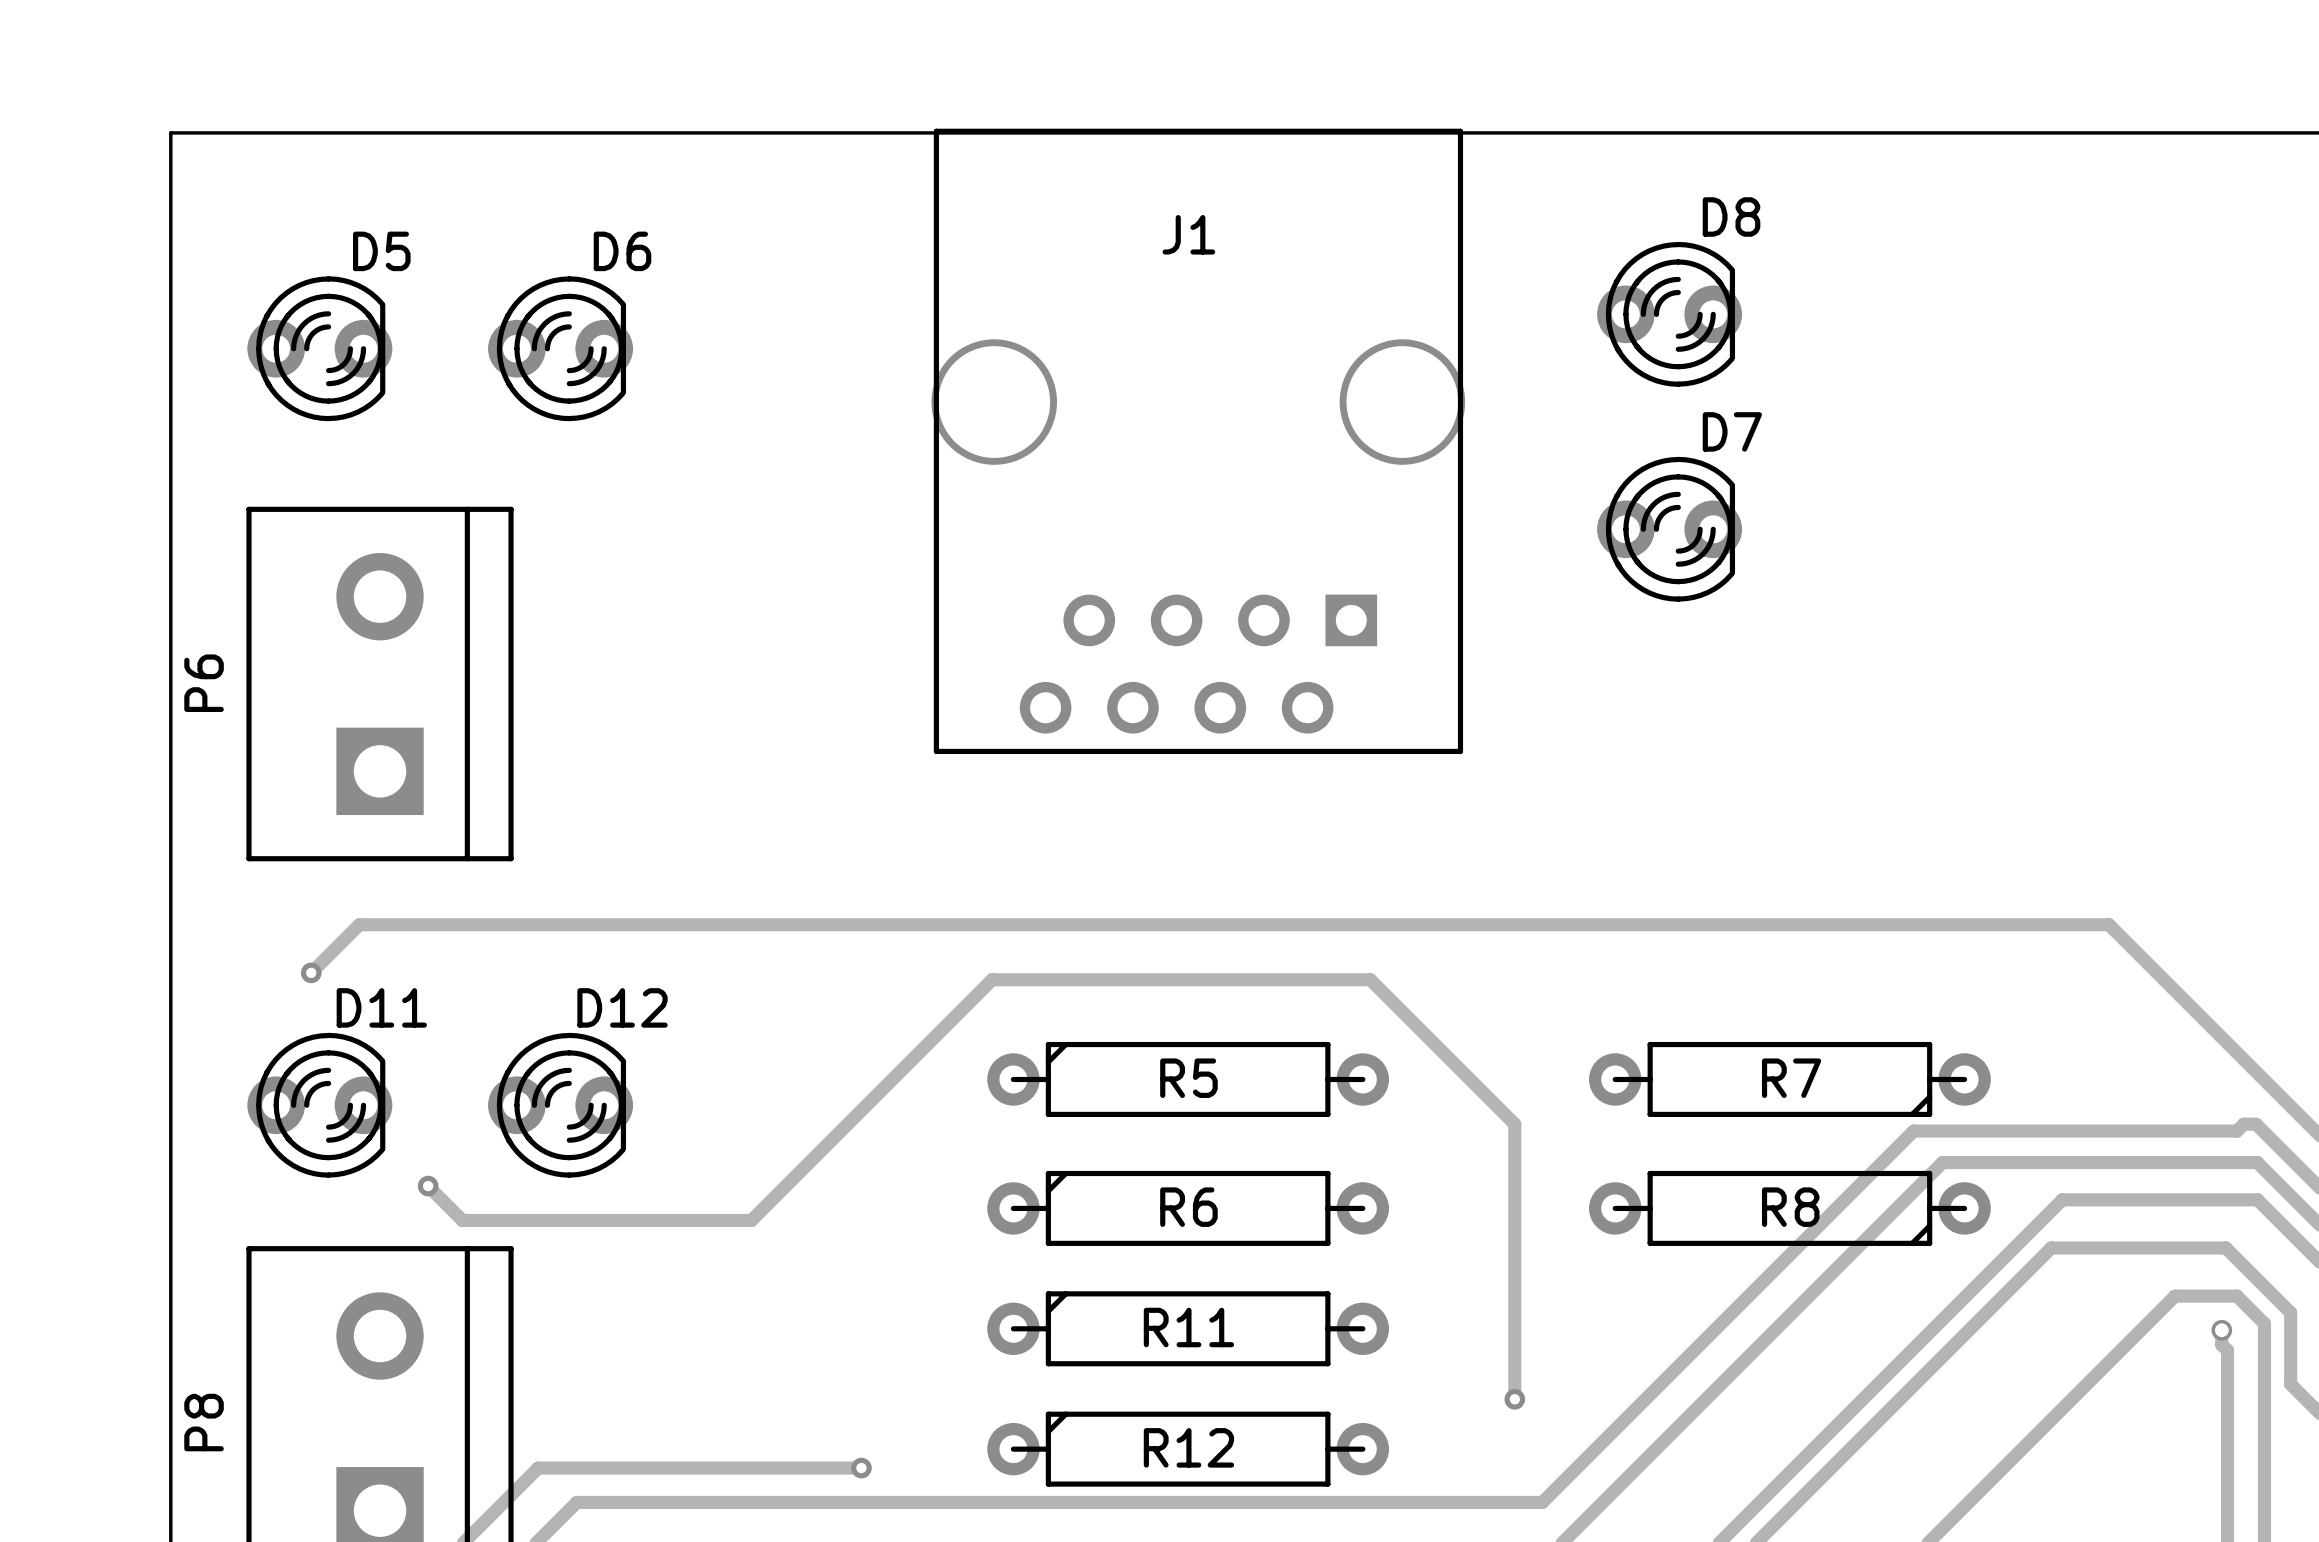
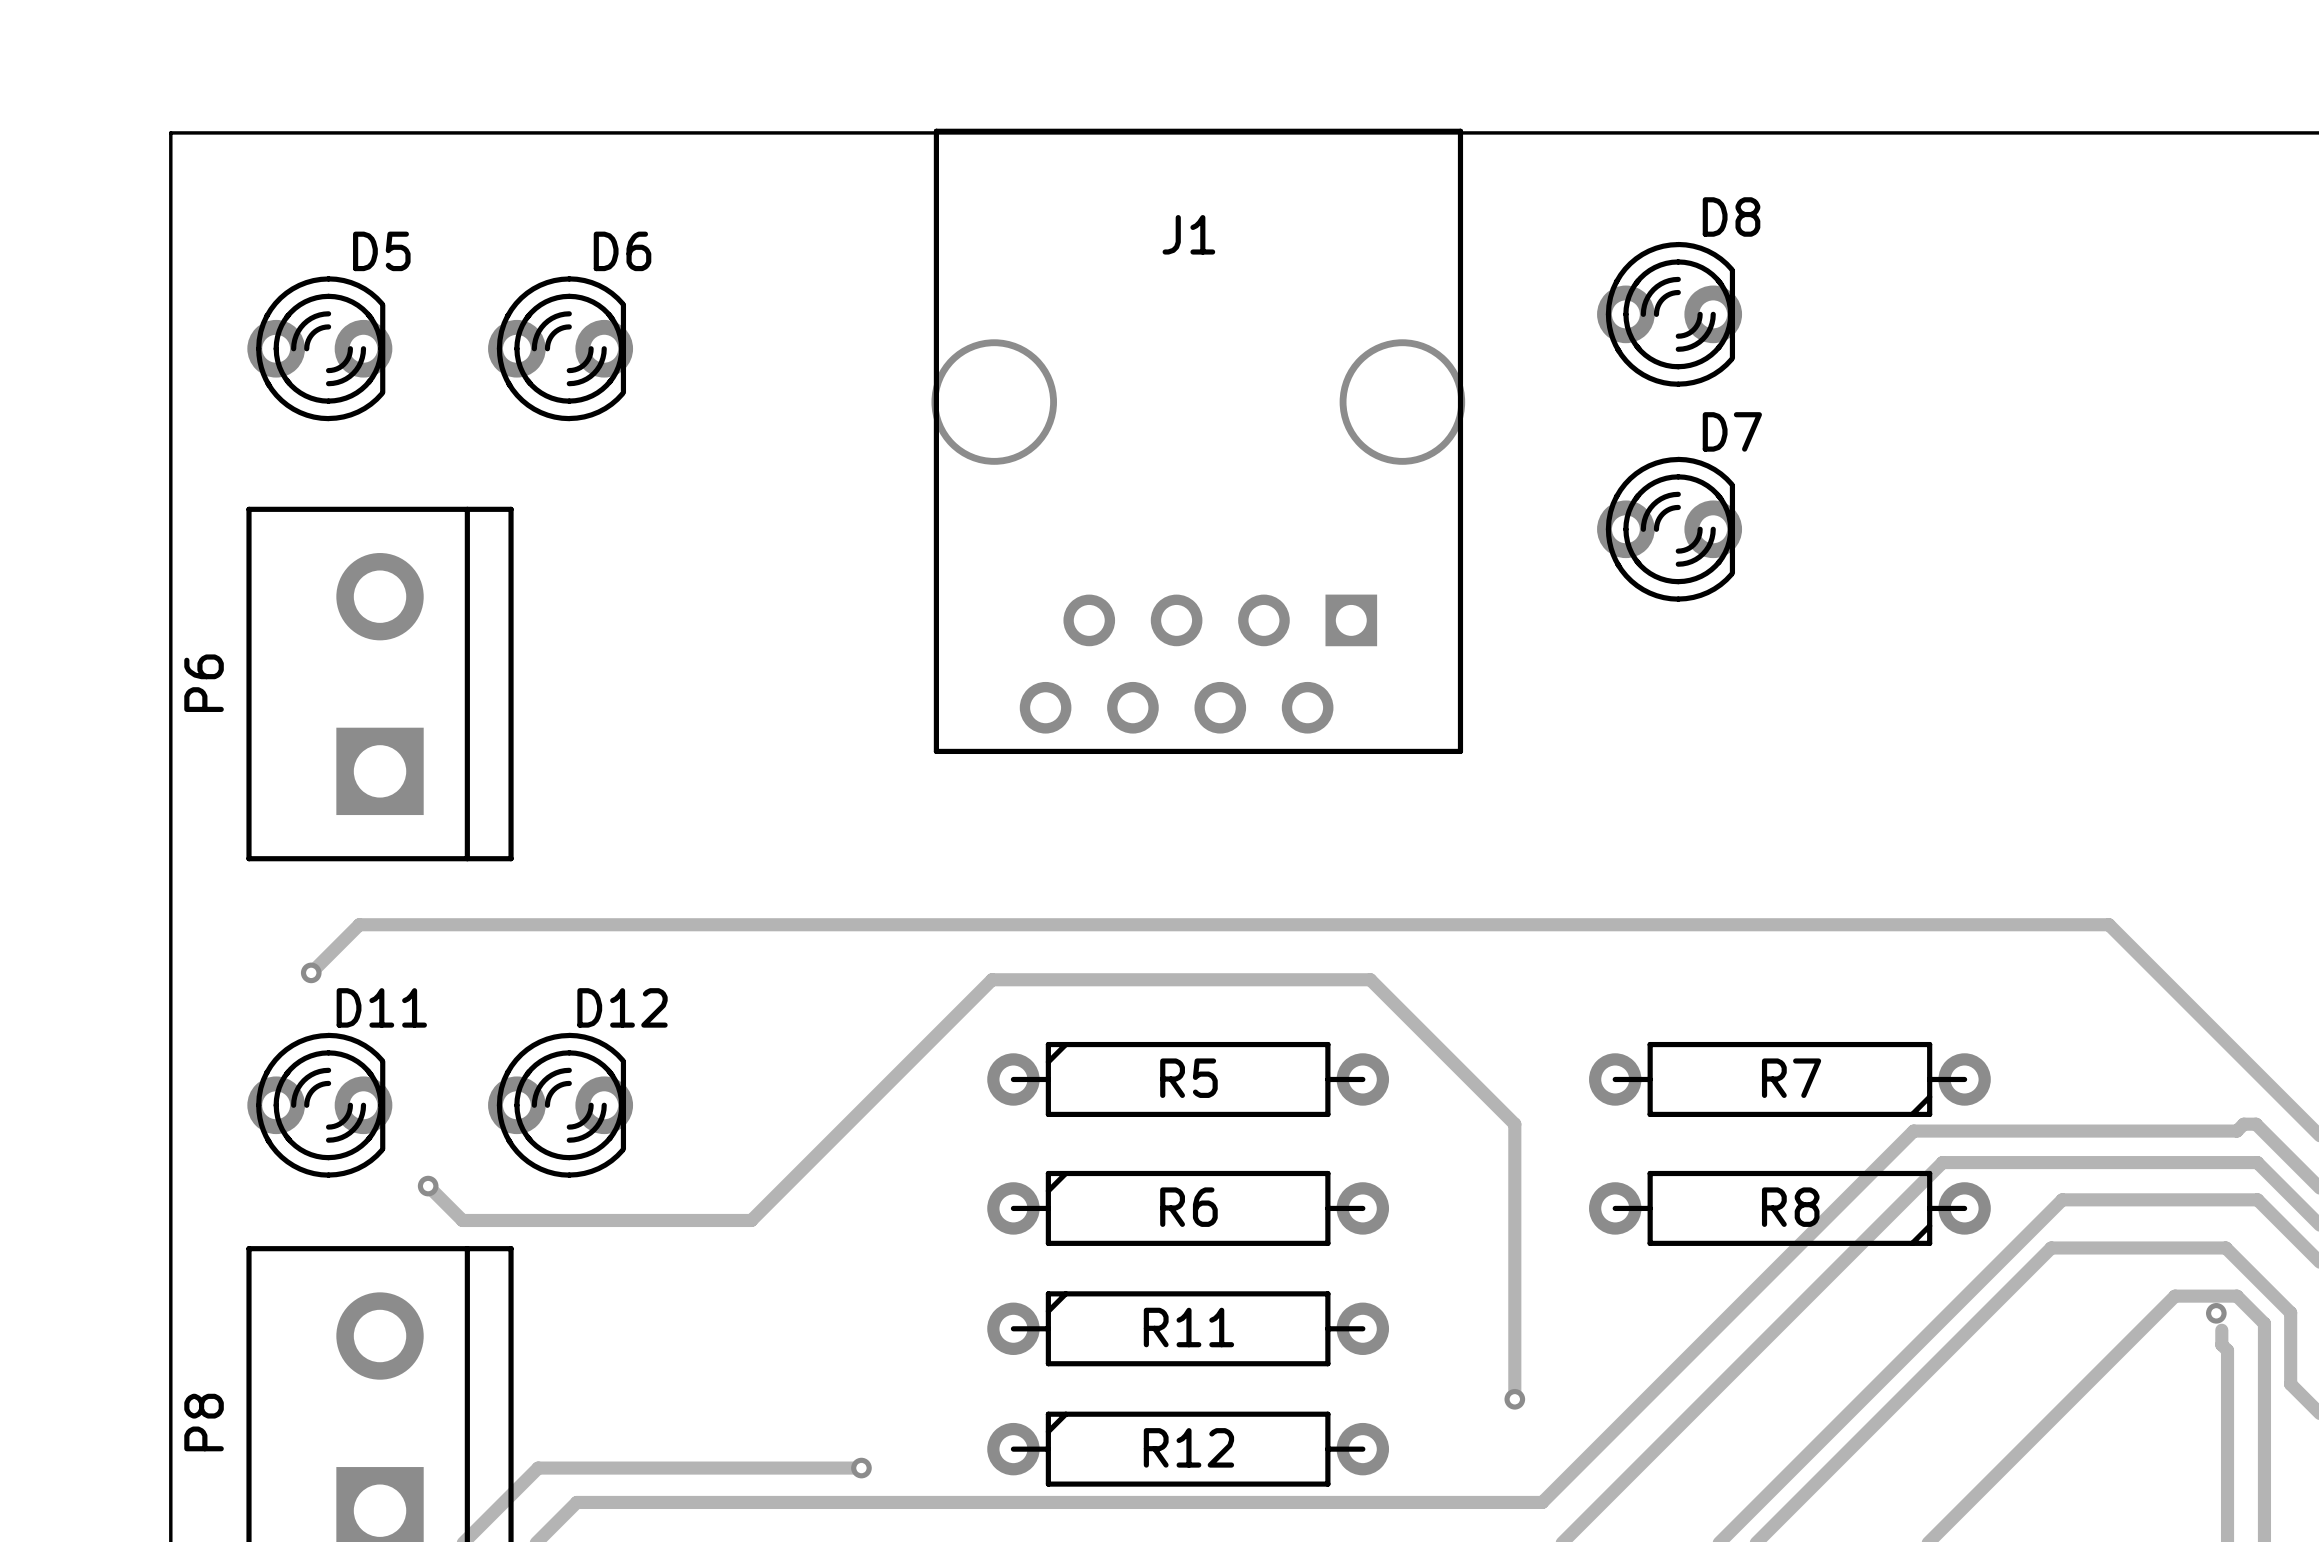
via position: (2221, 1330) -> (2216, 1313)

